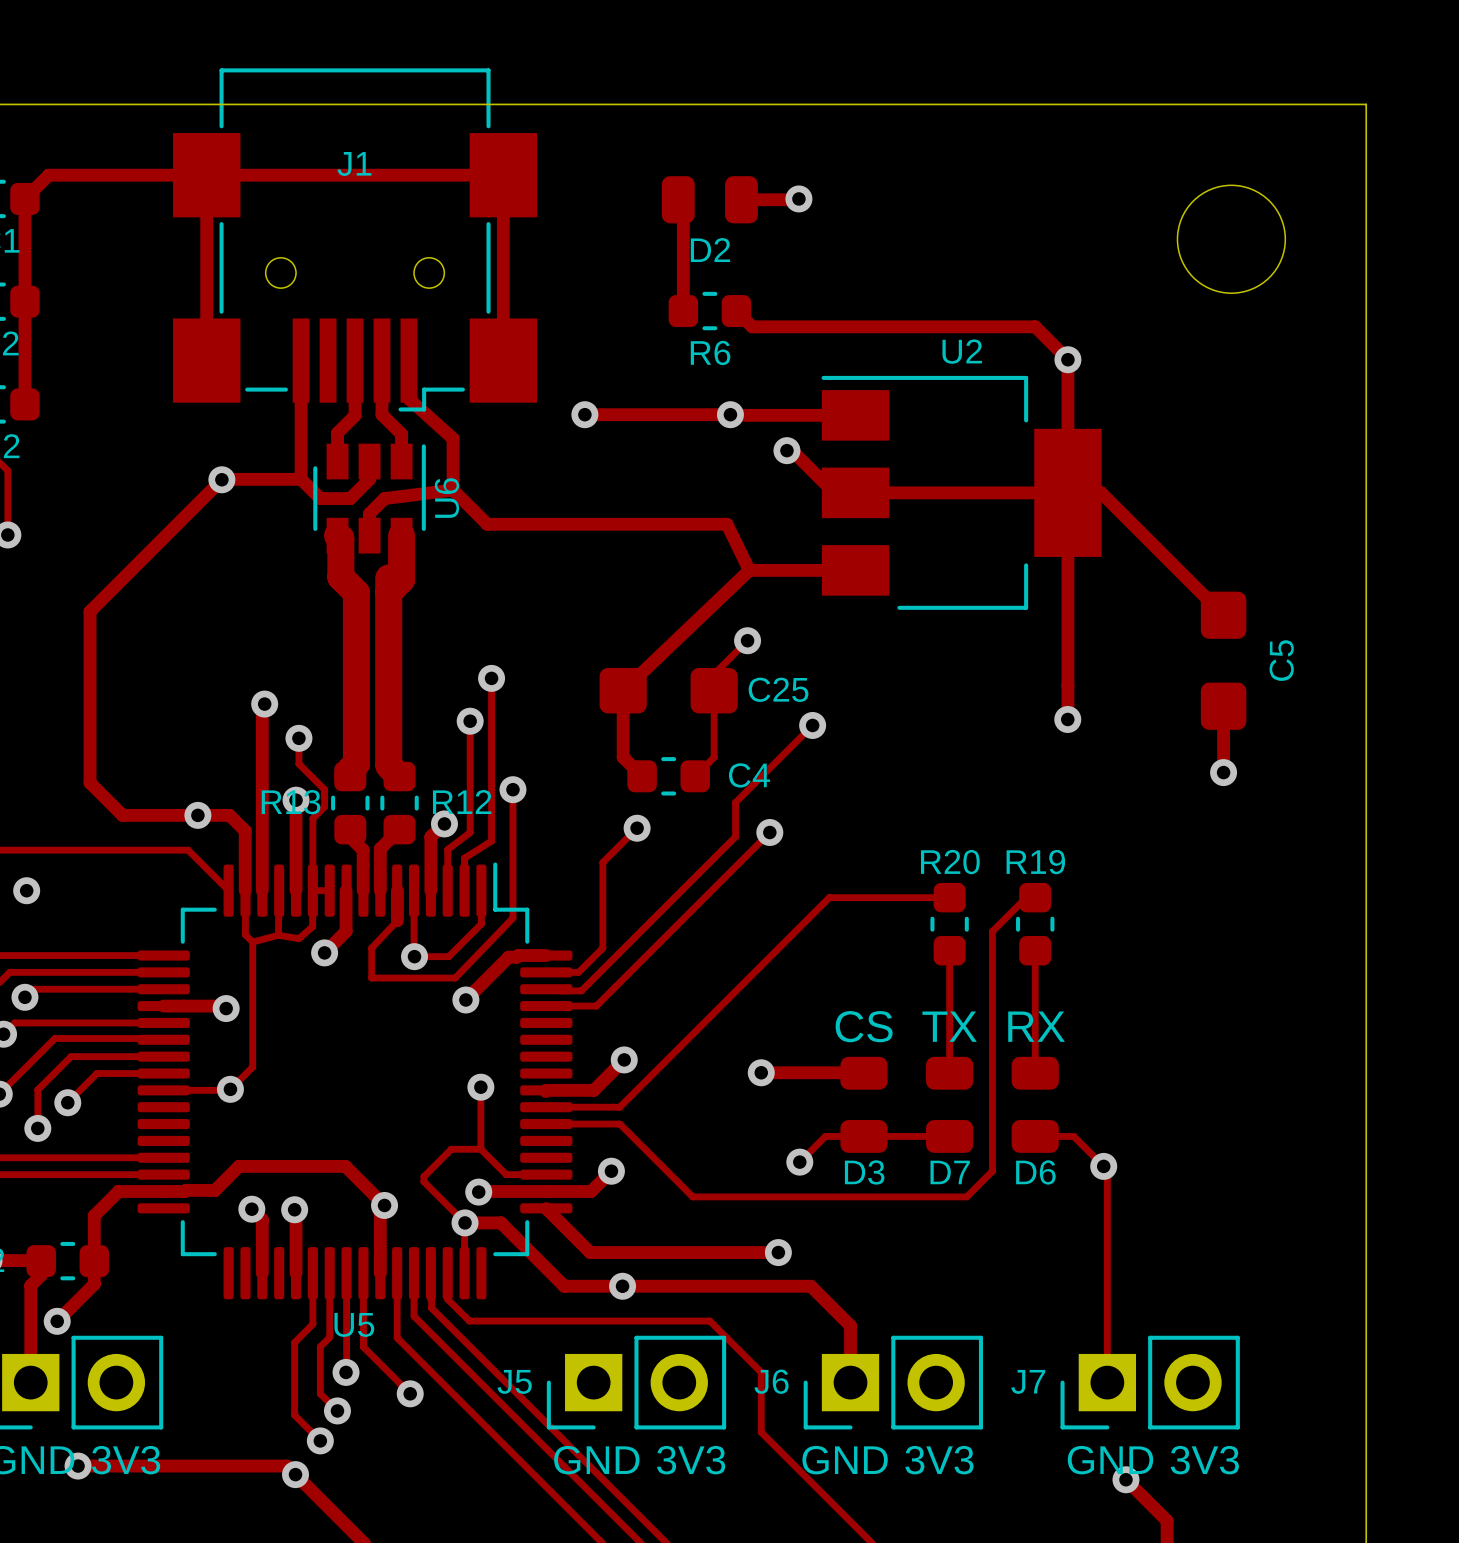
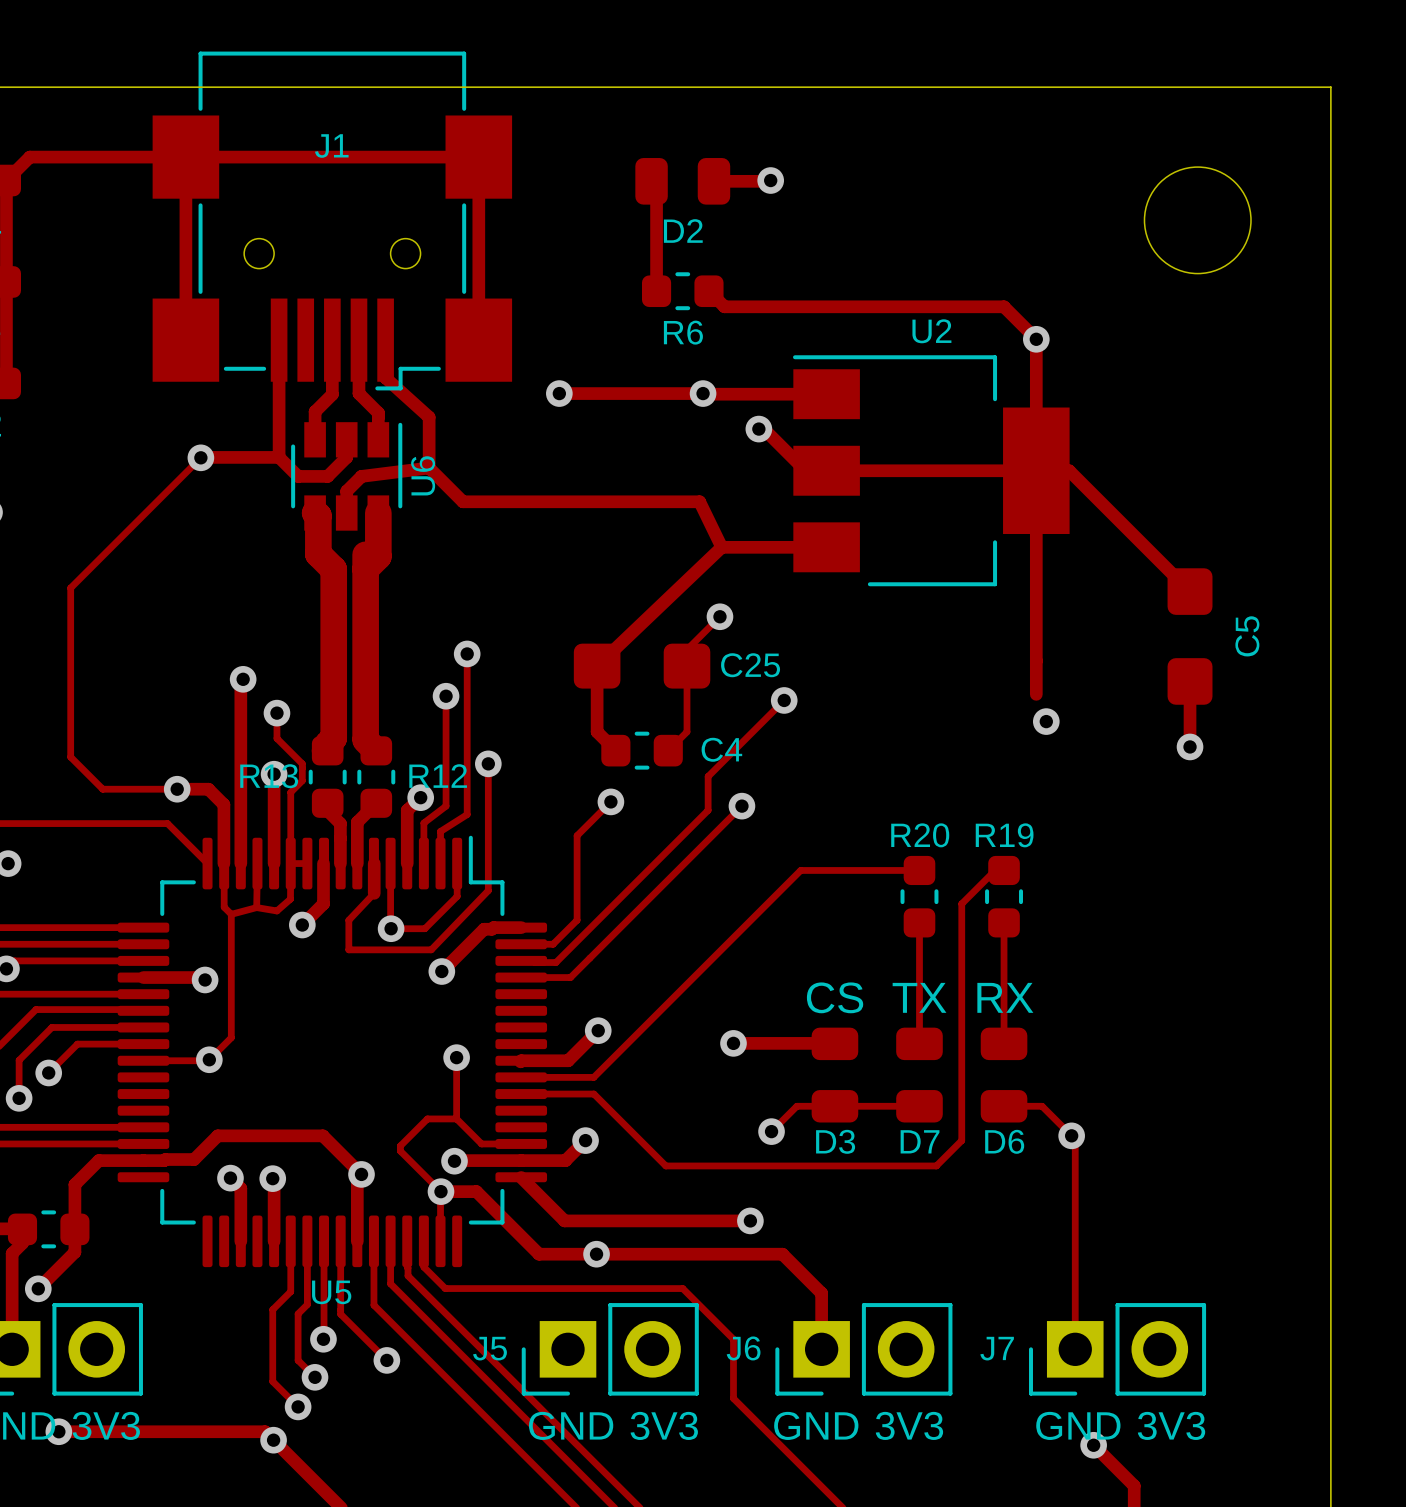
track width: thick (221, 479) (90, 611) (90, 782) (122, 815) (211, 815) -> thin (200, 457) (70, 588) (70, 757) (102, 789) (190, 789)
via position: (1067, 719) -> (1046, 721)

